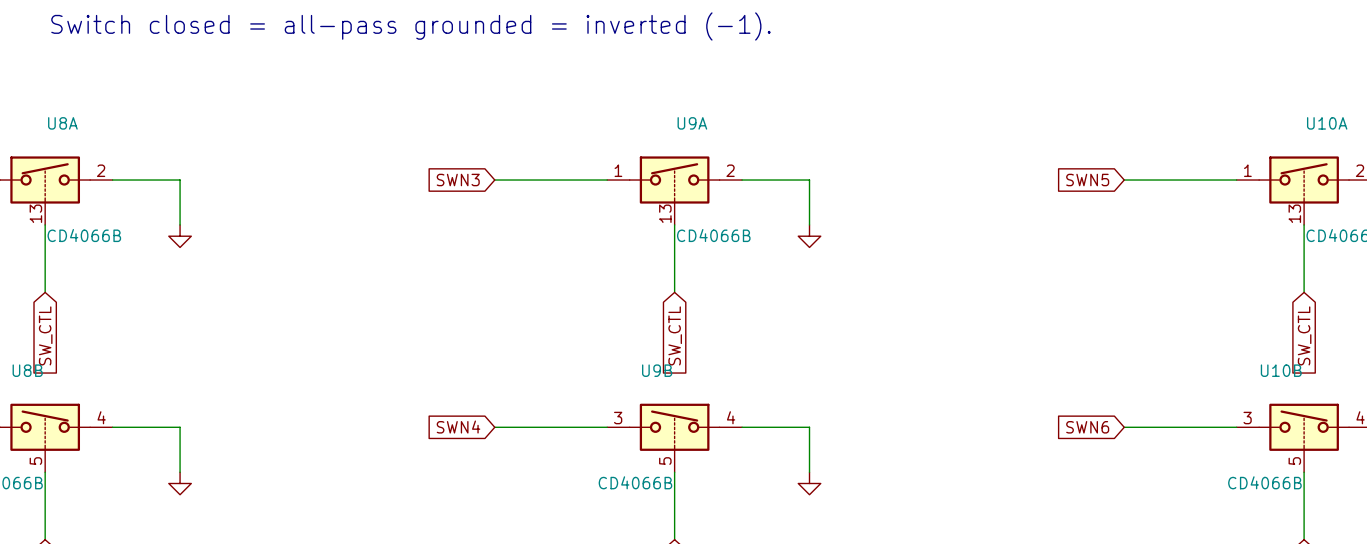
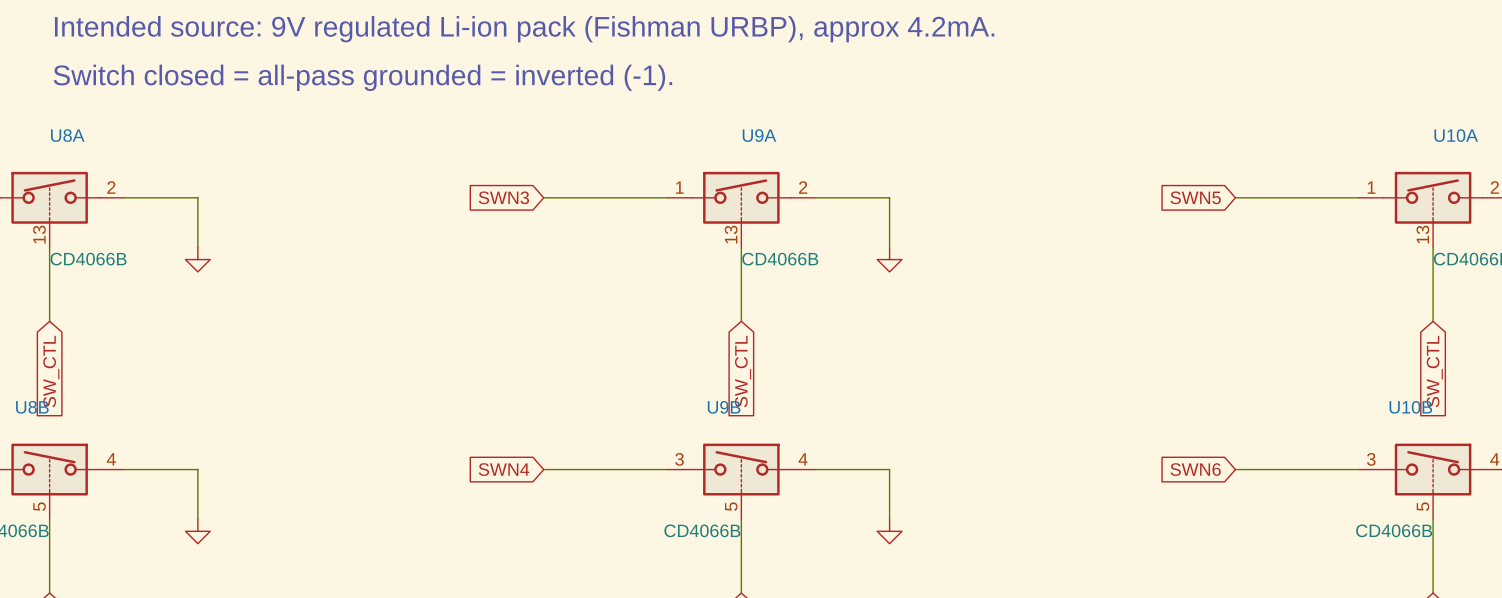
text: Switch closed = all-pass grounded = inverted (-1). (410, 26) -> Intended source: 9V regulated Li-ion pack (Fishman URBP), approx 4.2mA. (524, 29)
text: none -> Switch closed = all-pass grounded = inverted (-1). (362, 77)

